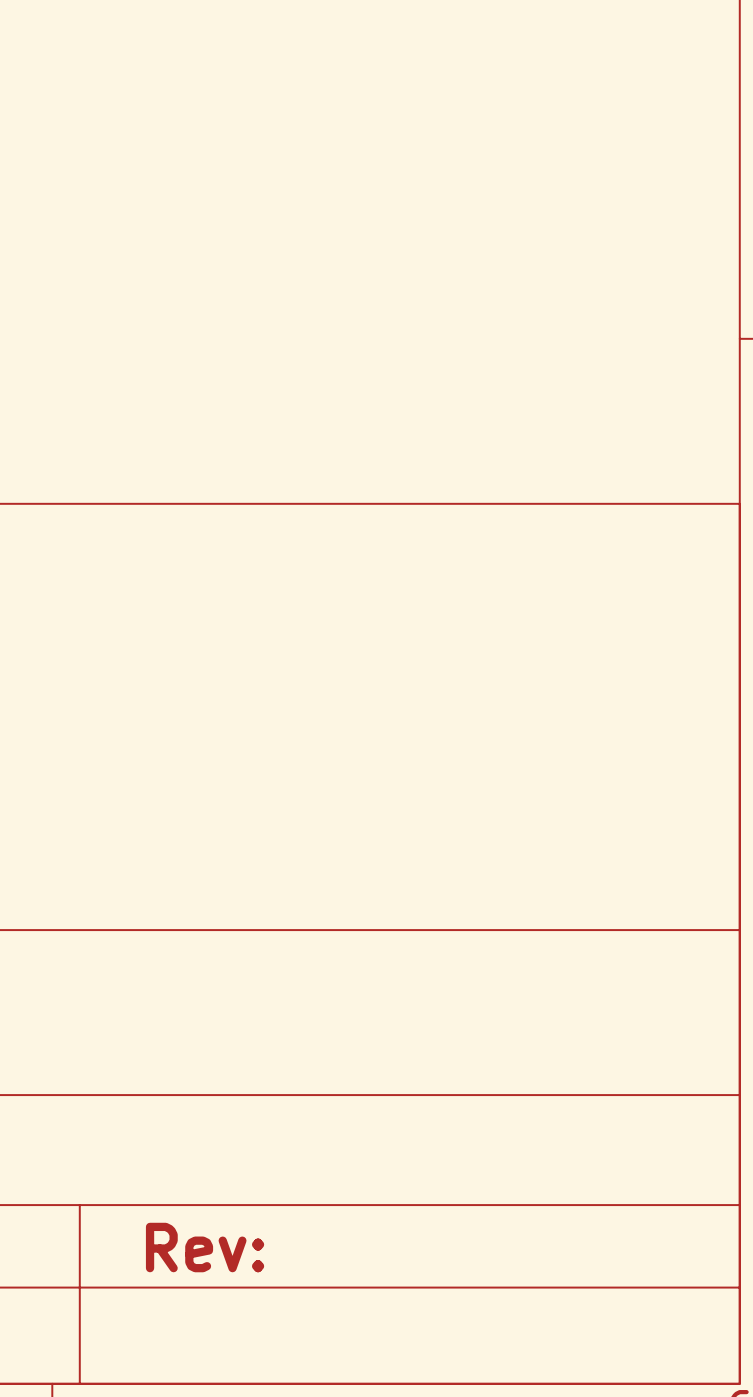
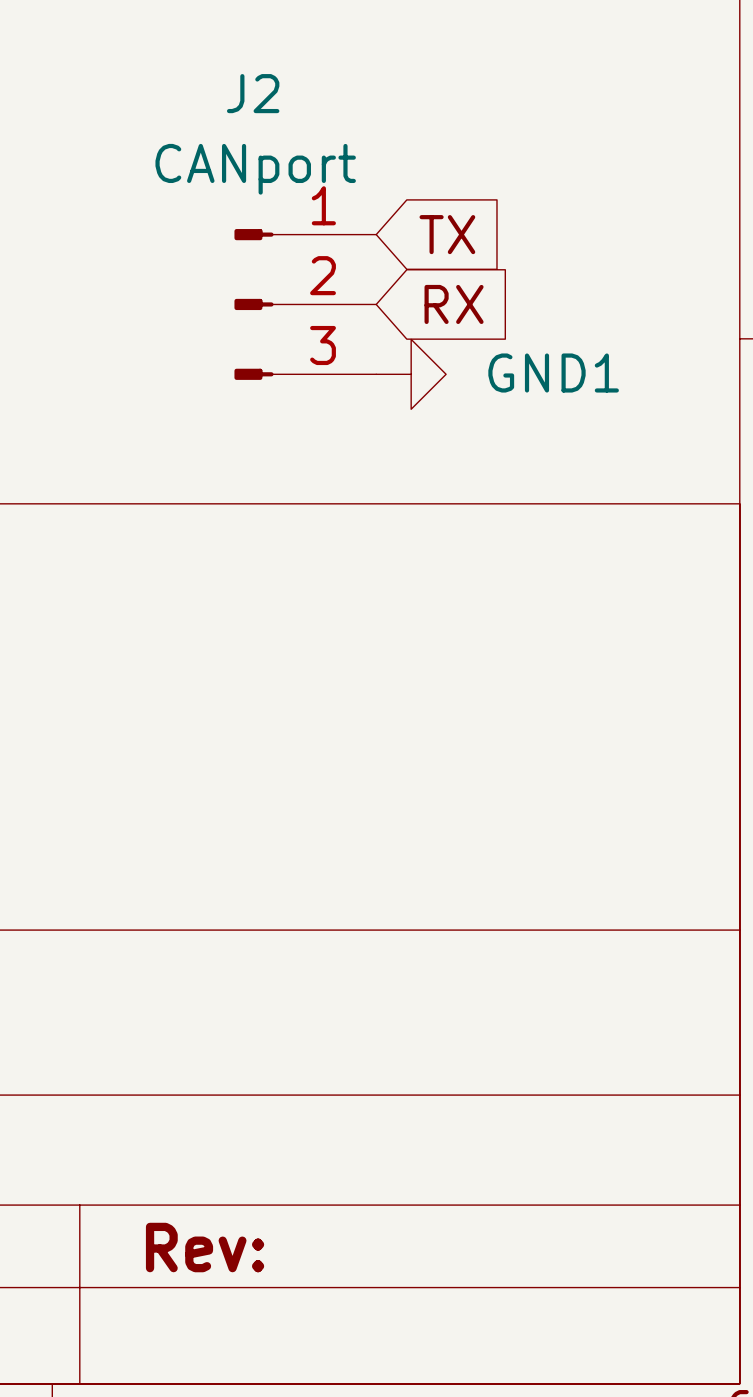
global label: none -> TX (447, 234)
J2: none -> CANport (305, 304)
global label: none -> RX (454, 304)
power symbol: none -> GND1 (411, 374)

